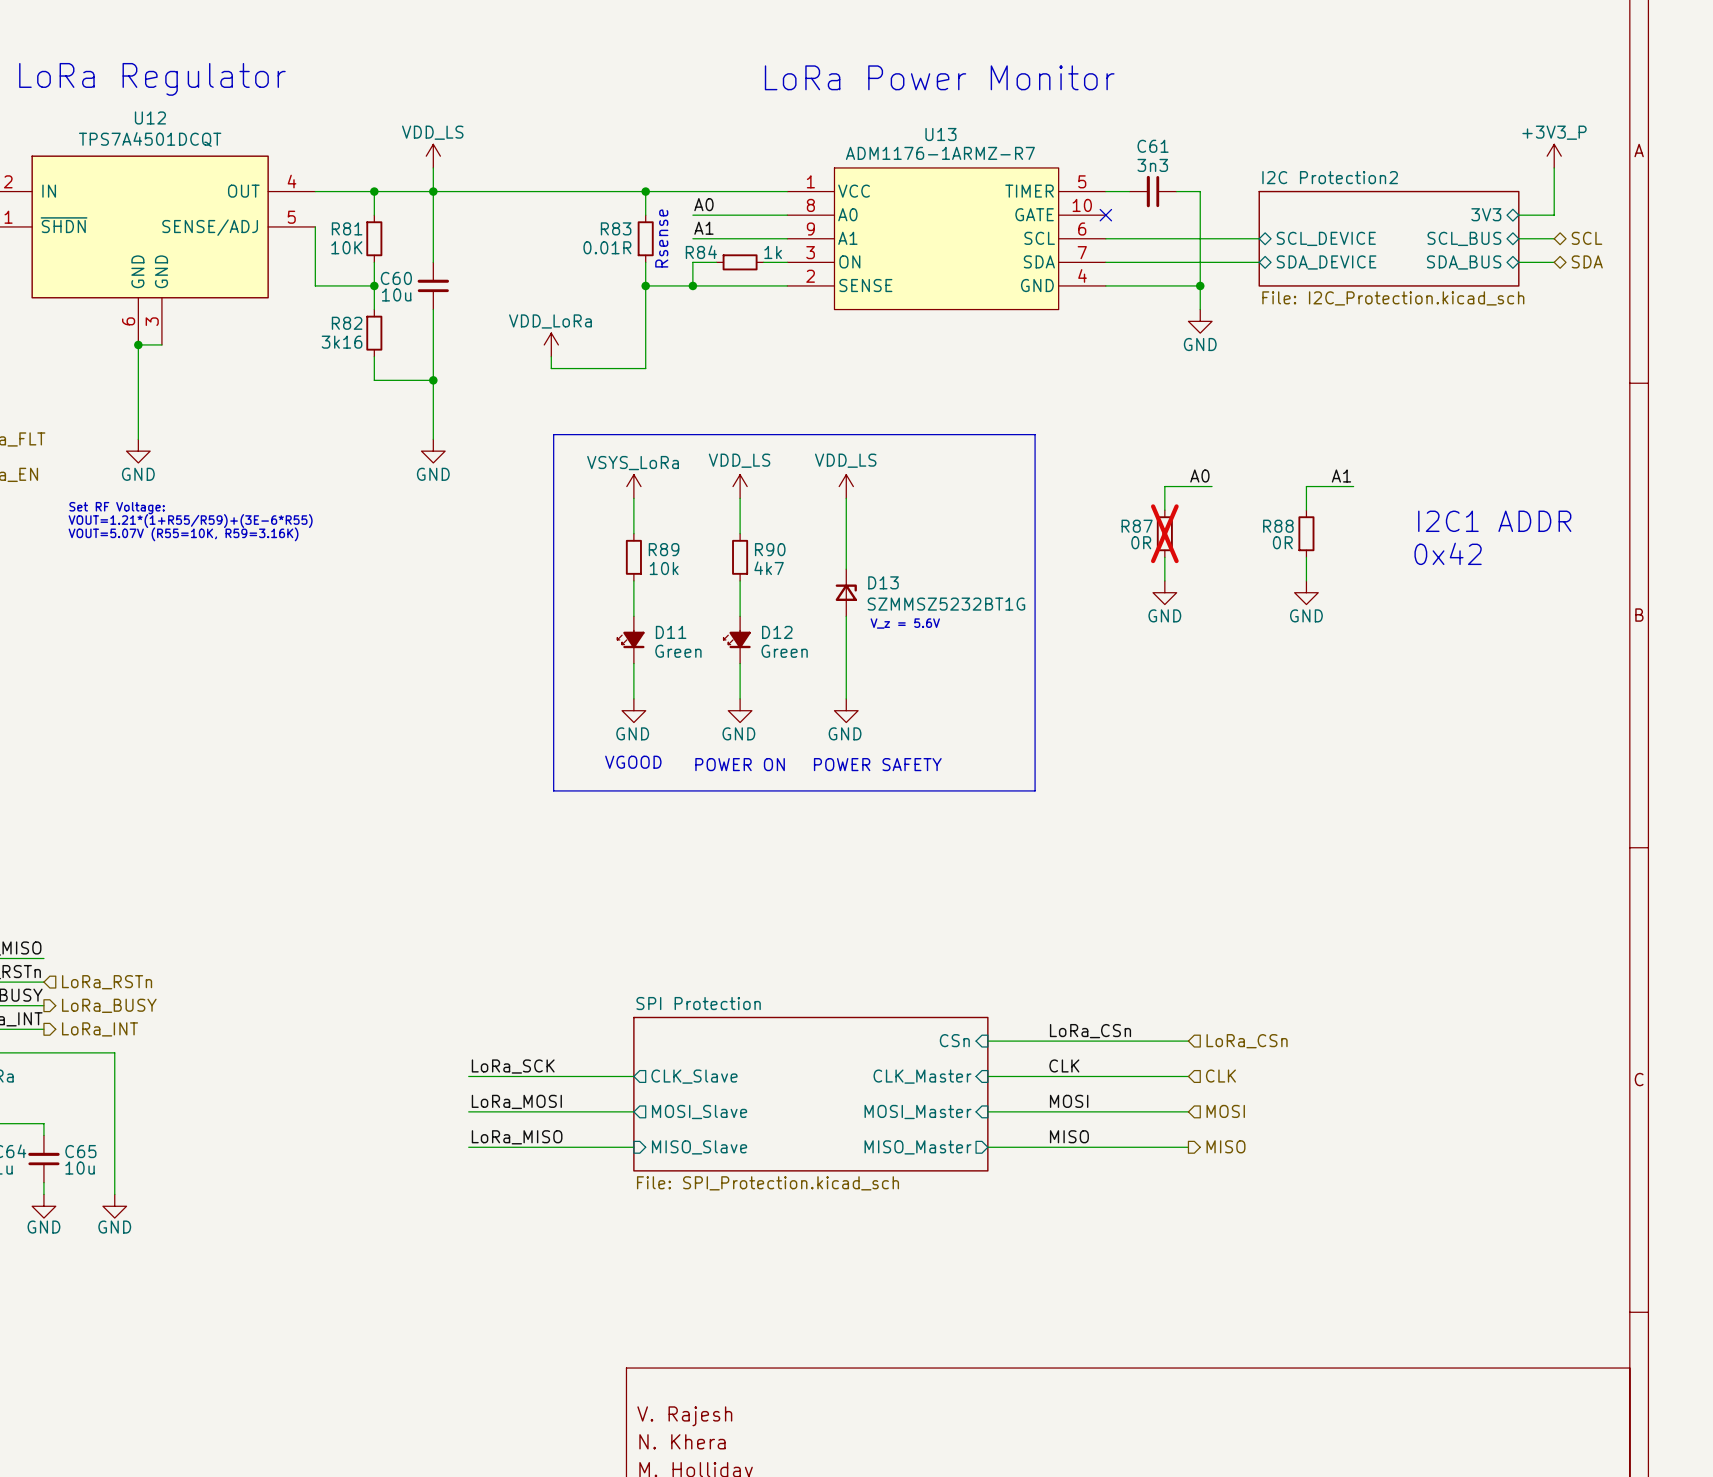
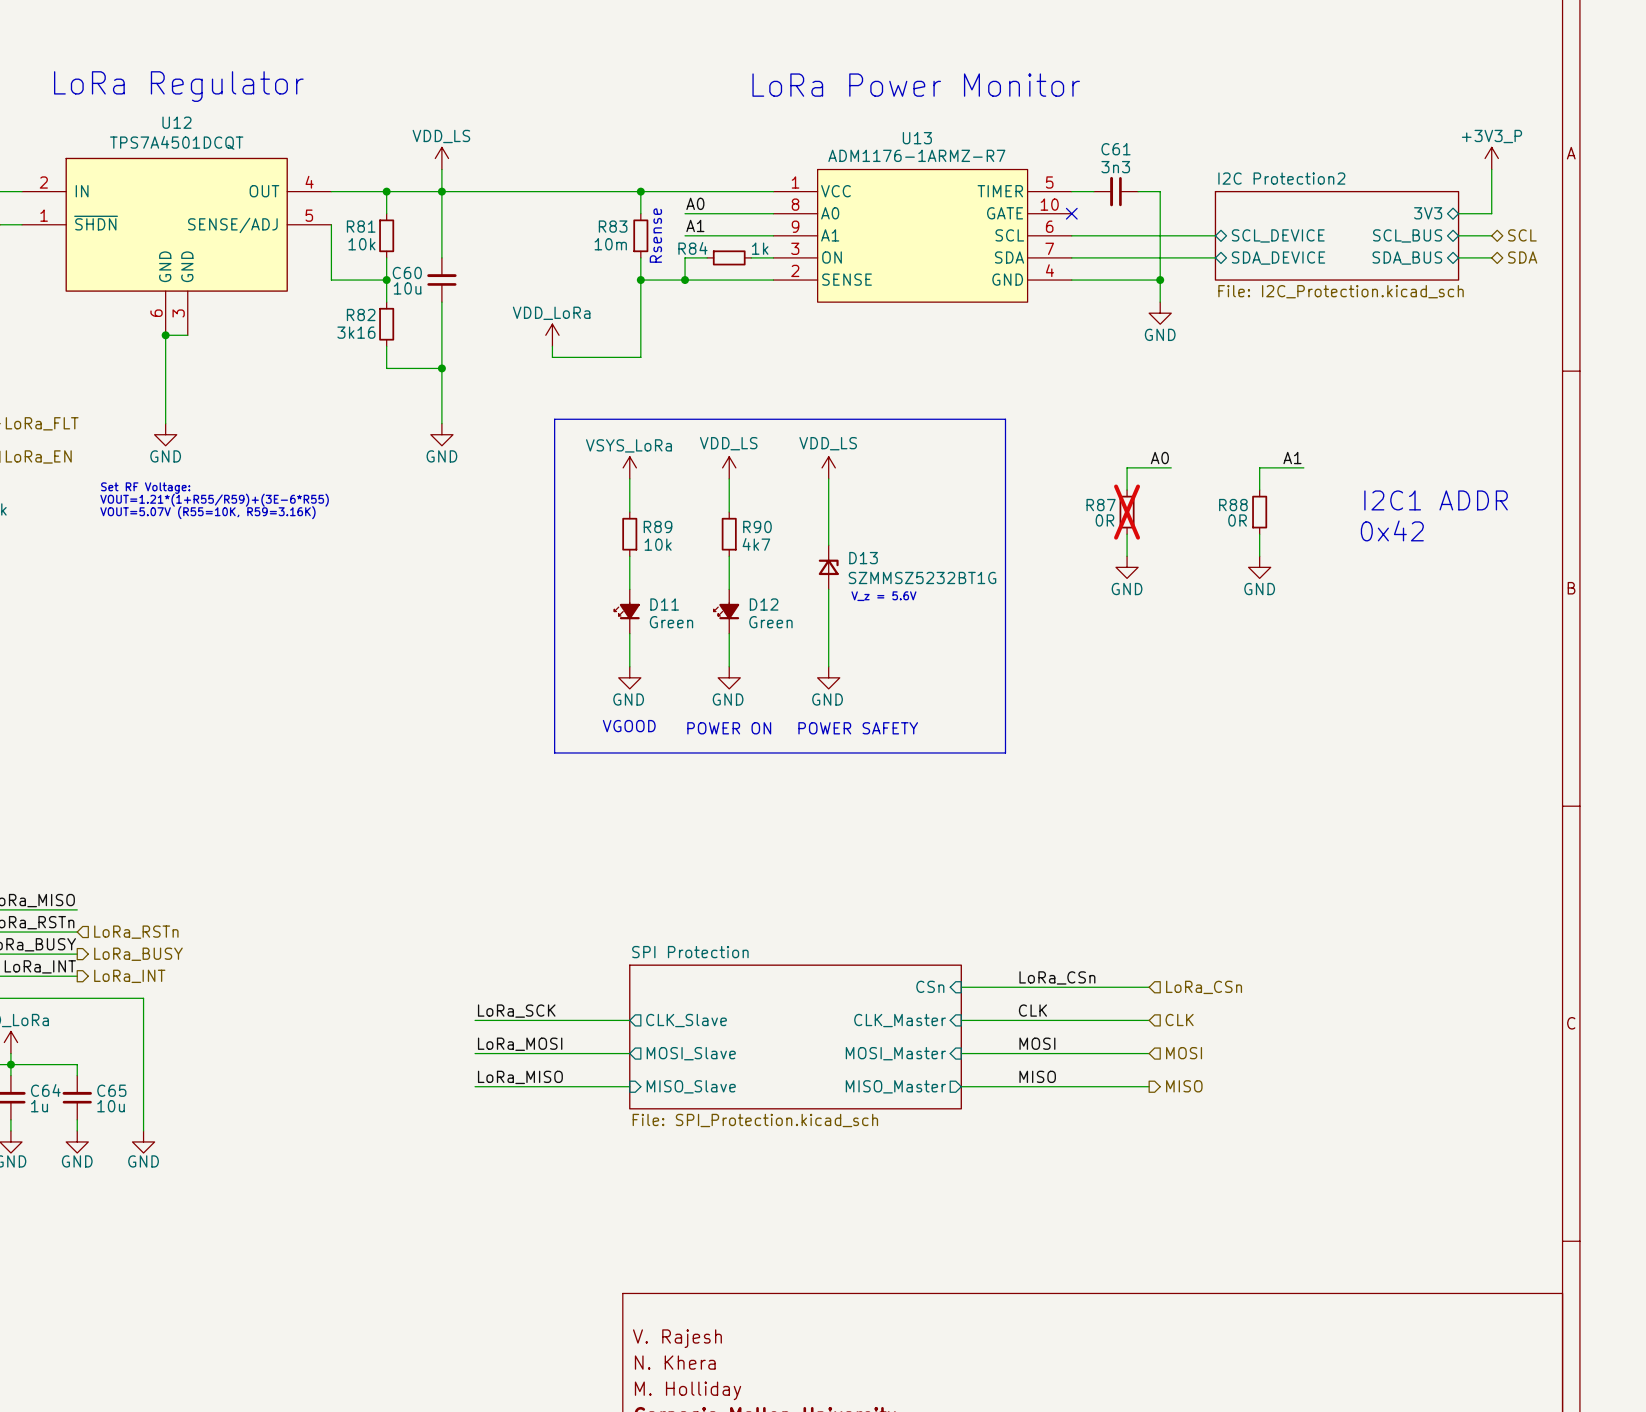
R81 value: 10K (346, 247) -> 10k (361, 244)
R83 value: 0.01R (607, 247) -> 10m (610, 244)

